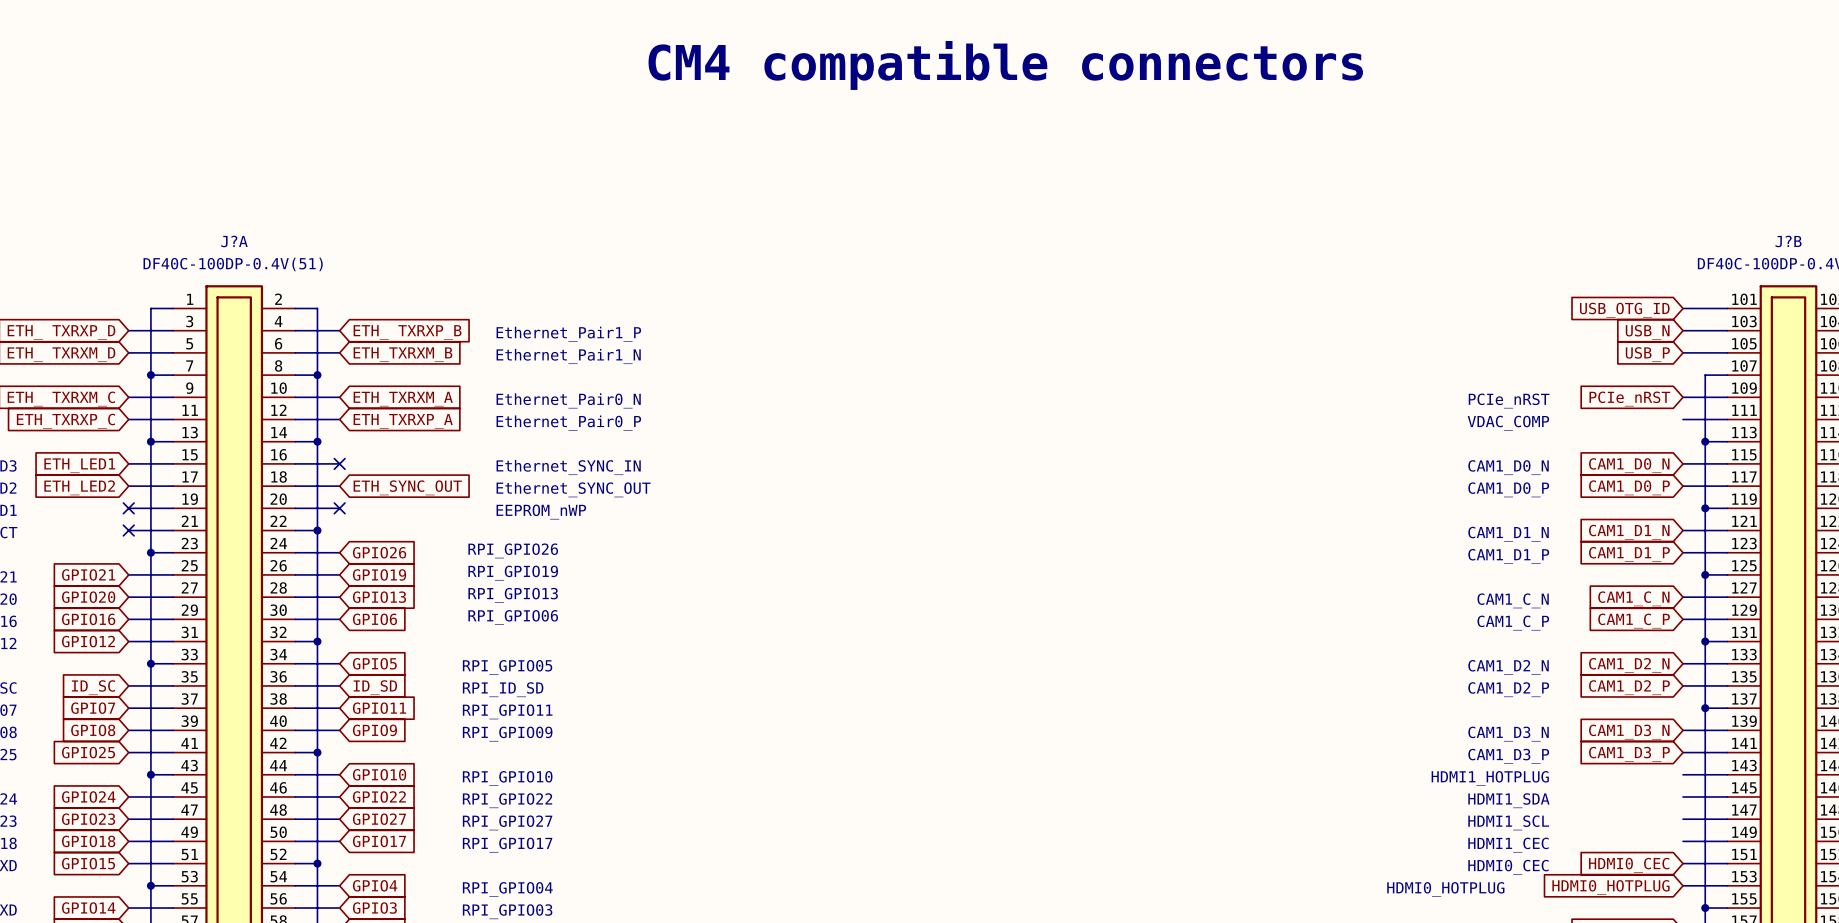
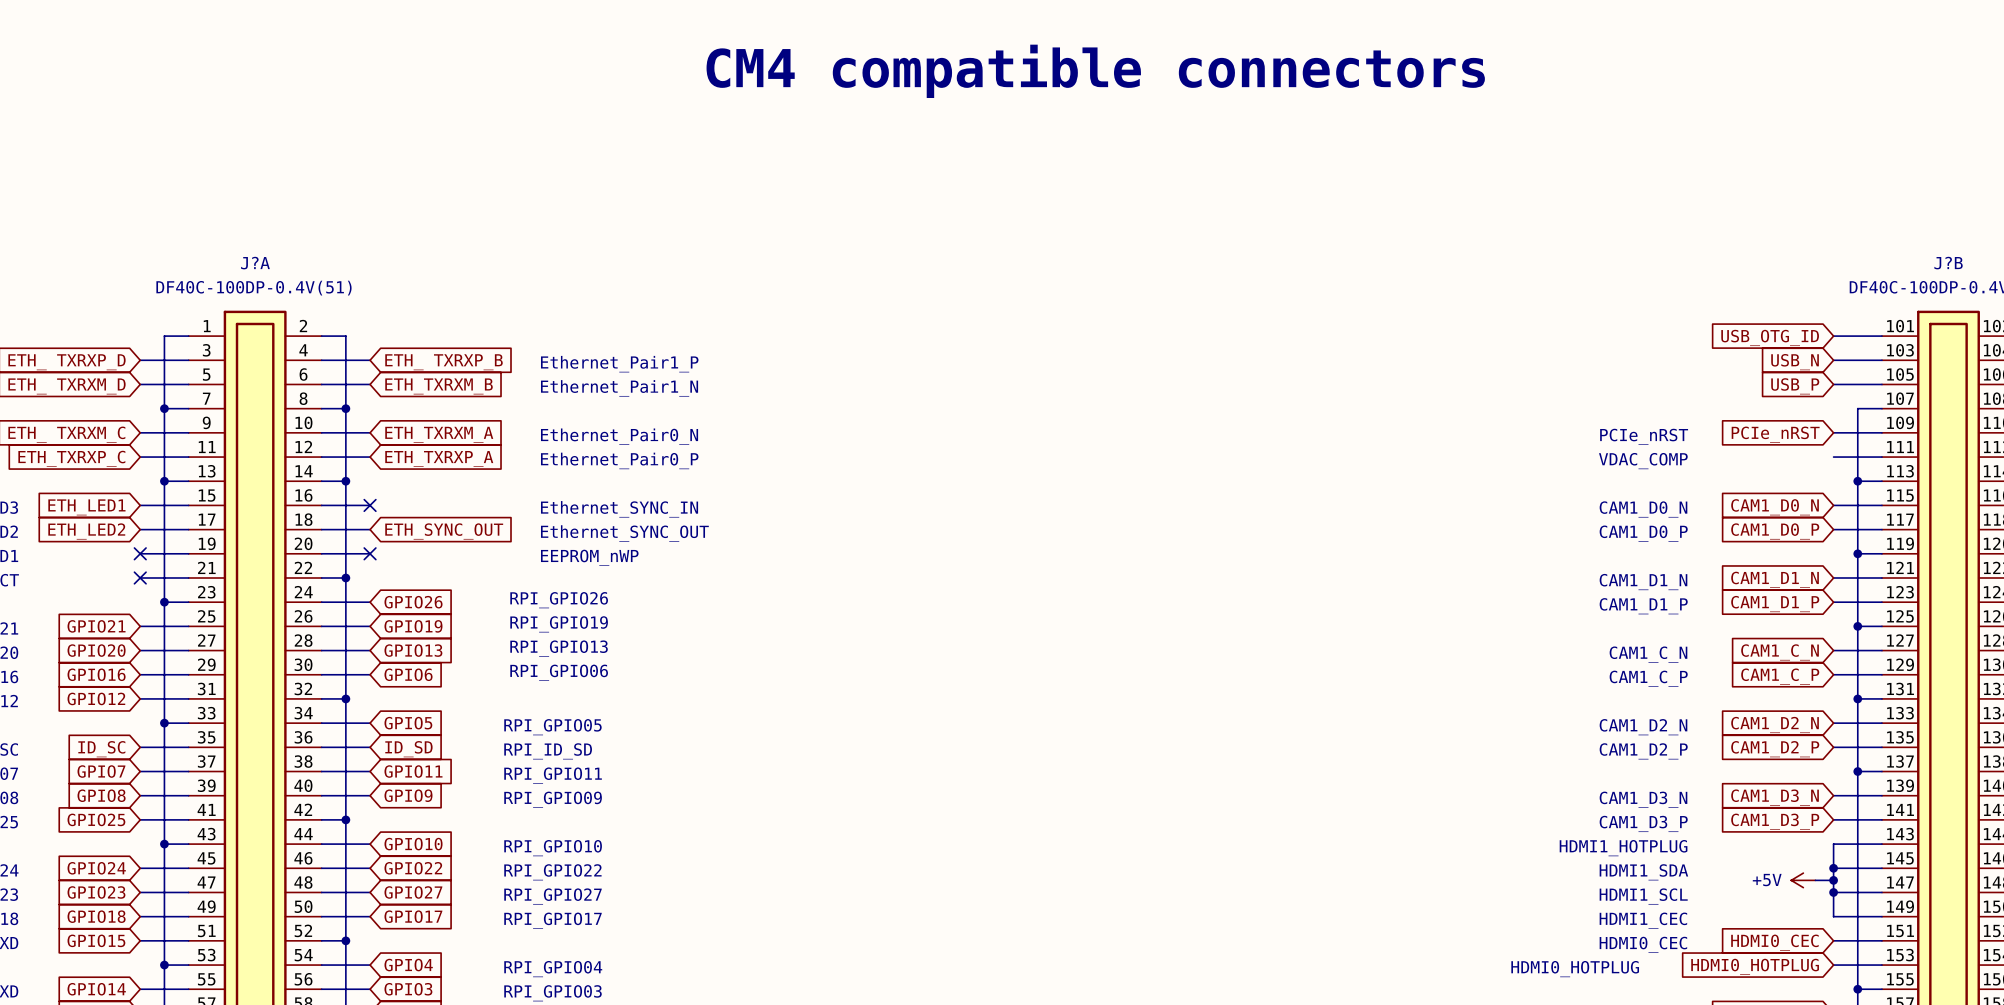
wire: none -> (1833, 844) (1833, 916)
junction: none -> (1833, 868)
power symbol: none -> +5V (1803, 880)
wire: none -> (1815, 880) (1833, 880)
junction: none -> (1833, 880)
junction: none -> (1833, 892)

